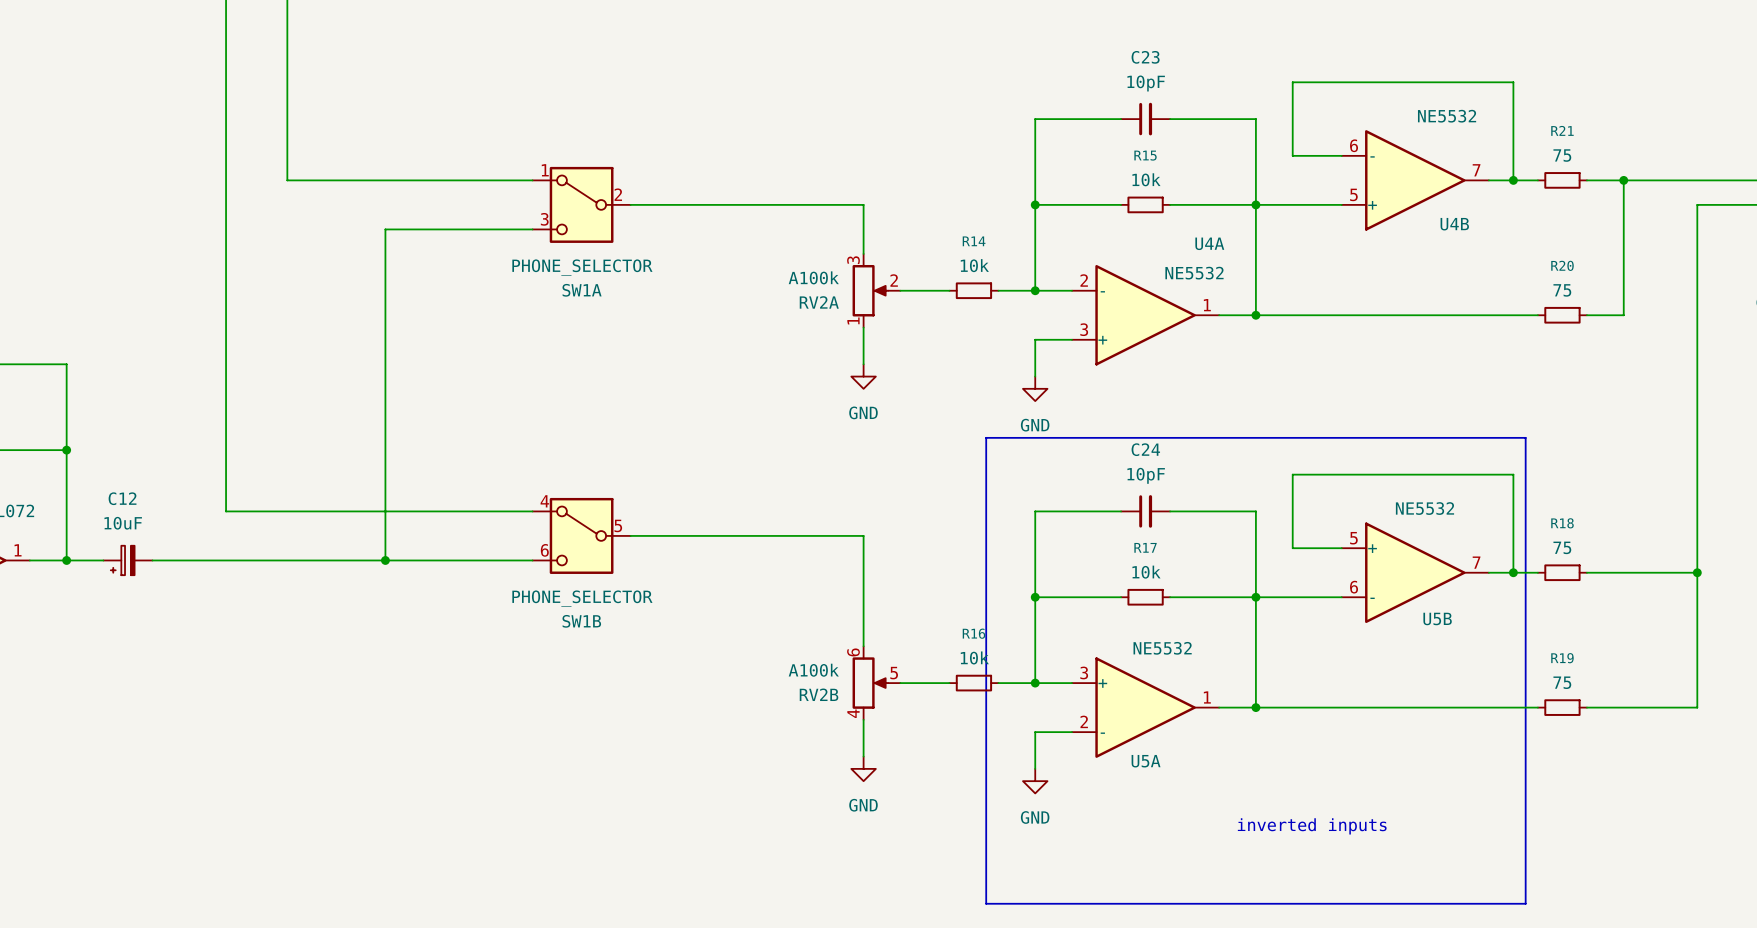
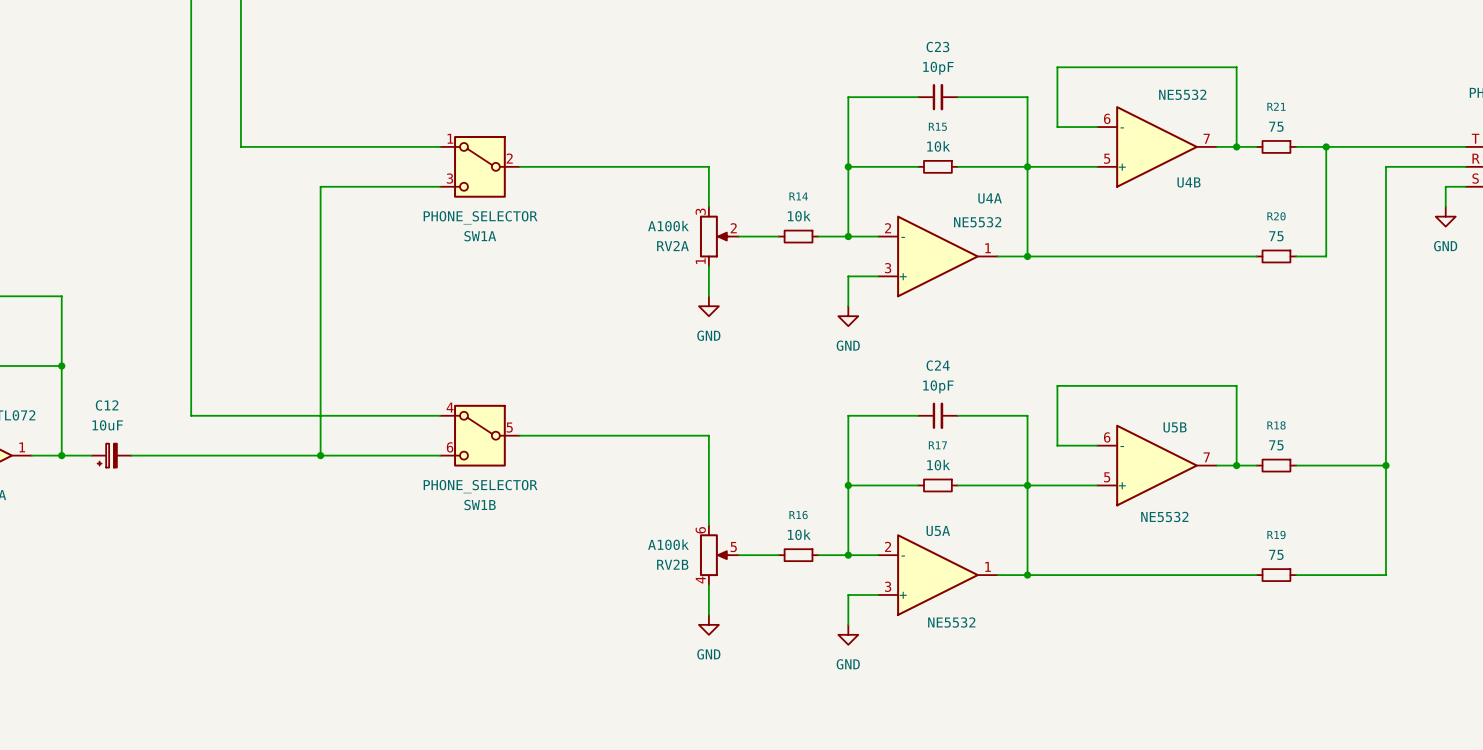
line: (986, 437) (1525, 437) (1525, 903) (986, 903) (986, 437) -> none
U5B flip: as is (1415, 572) -> up-down (1156, 465)
U5A flip: as is (1145, 707) -> up-down (937, 575)
text: inverted inputs (1312, 826) -> none

